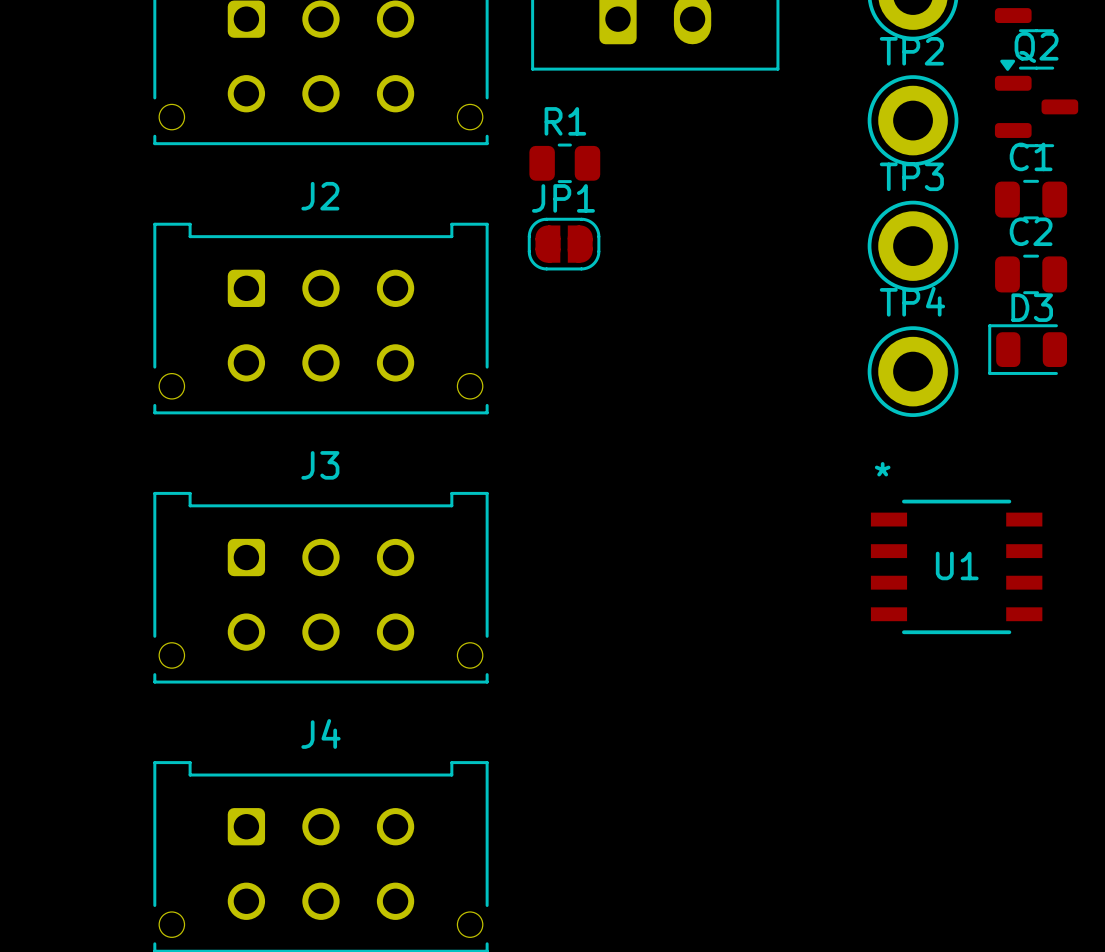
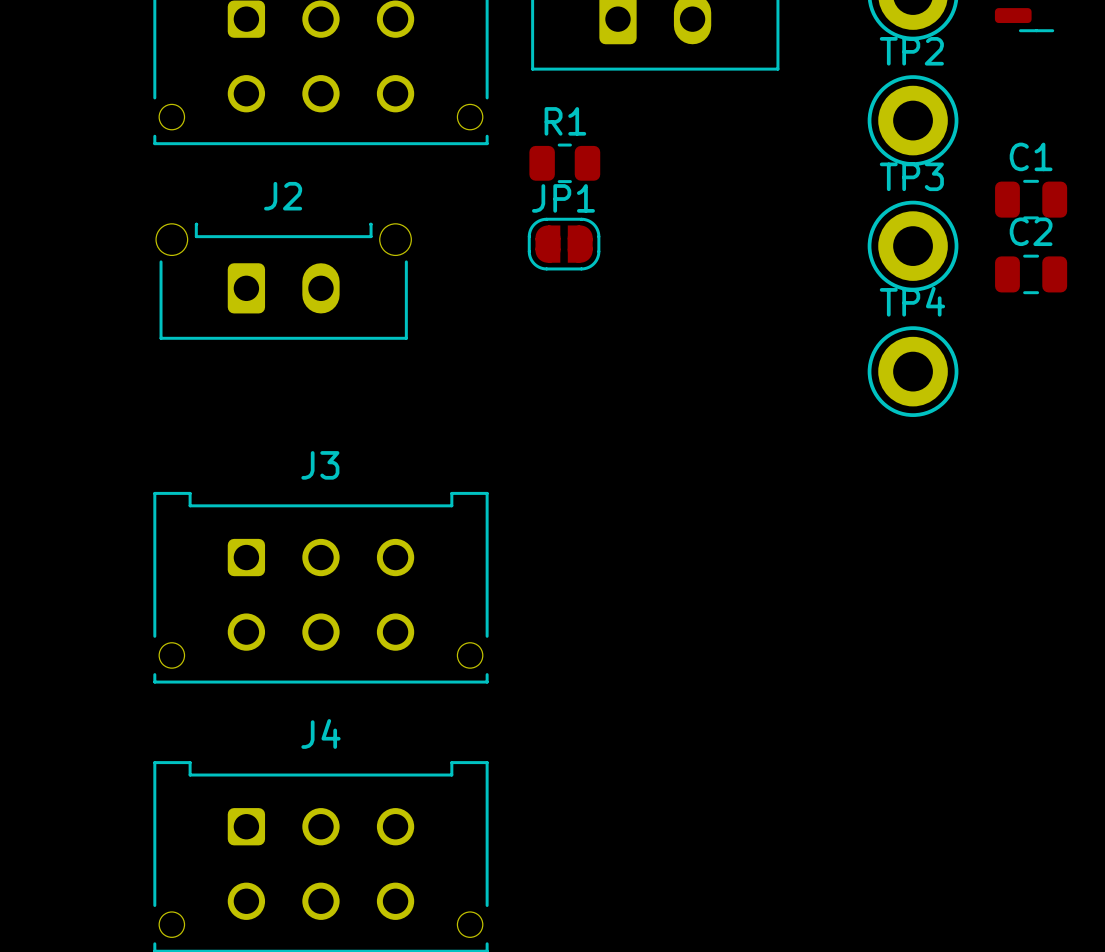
Q2: (1036, 103) -> none
J2 footprint: [153, 222, 489, 415] -> [156, 222, 412, 340]
D3: (1027, 349) -> none
U1: (956, 566) -> none

